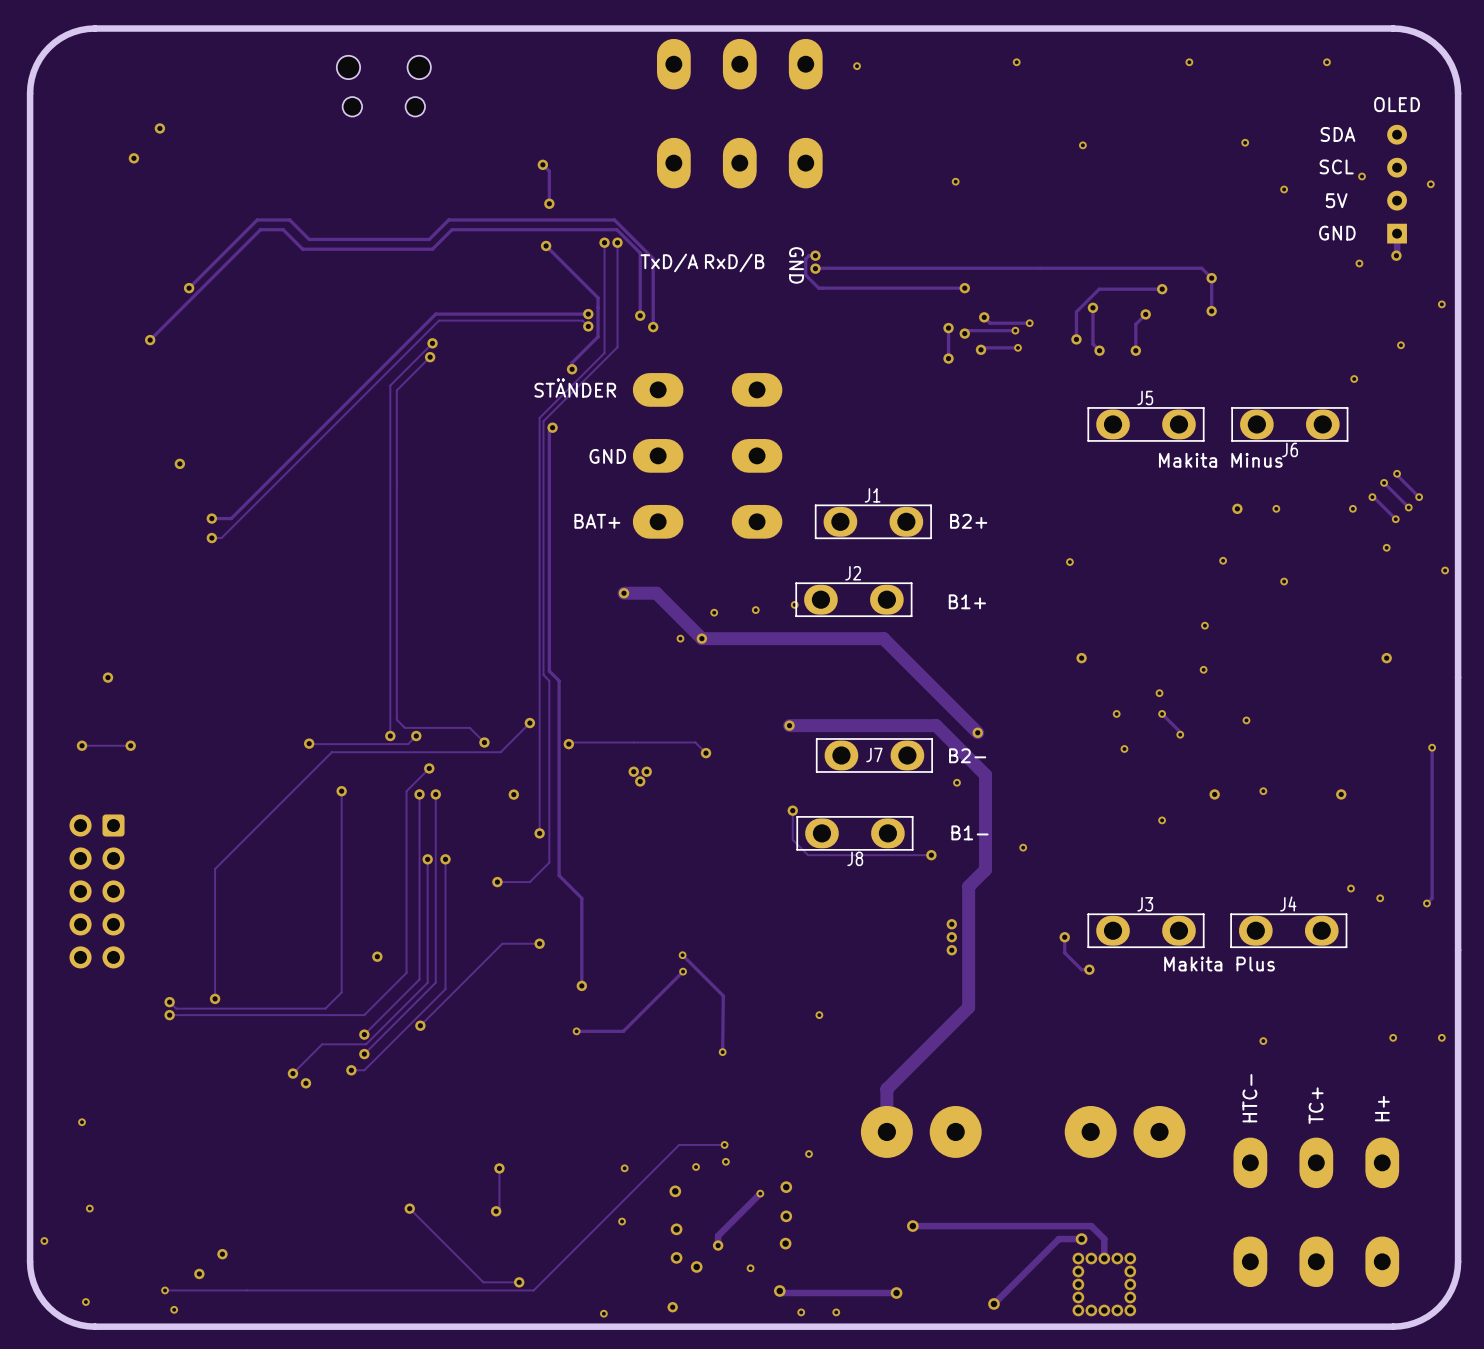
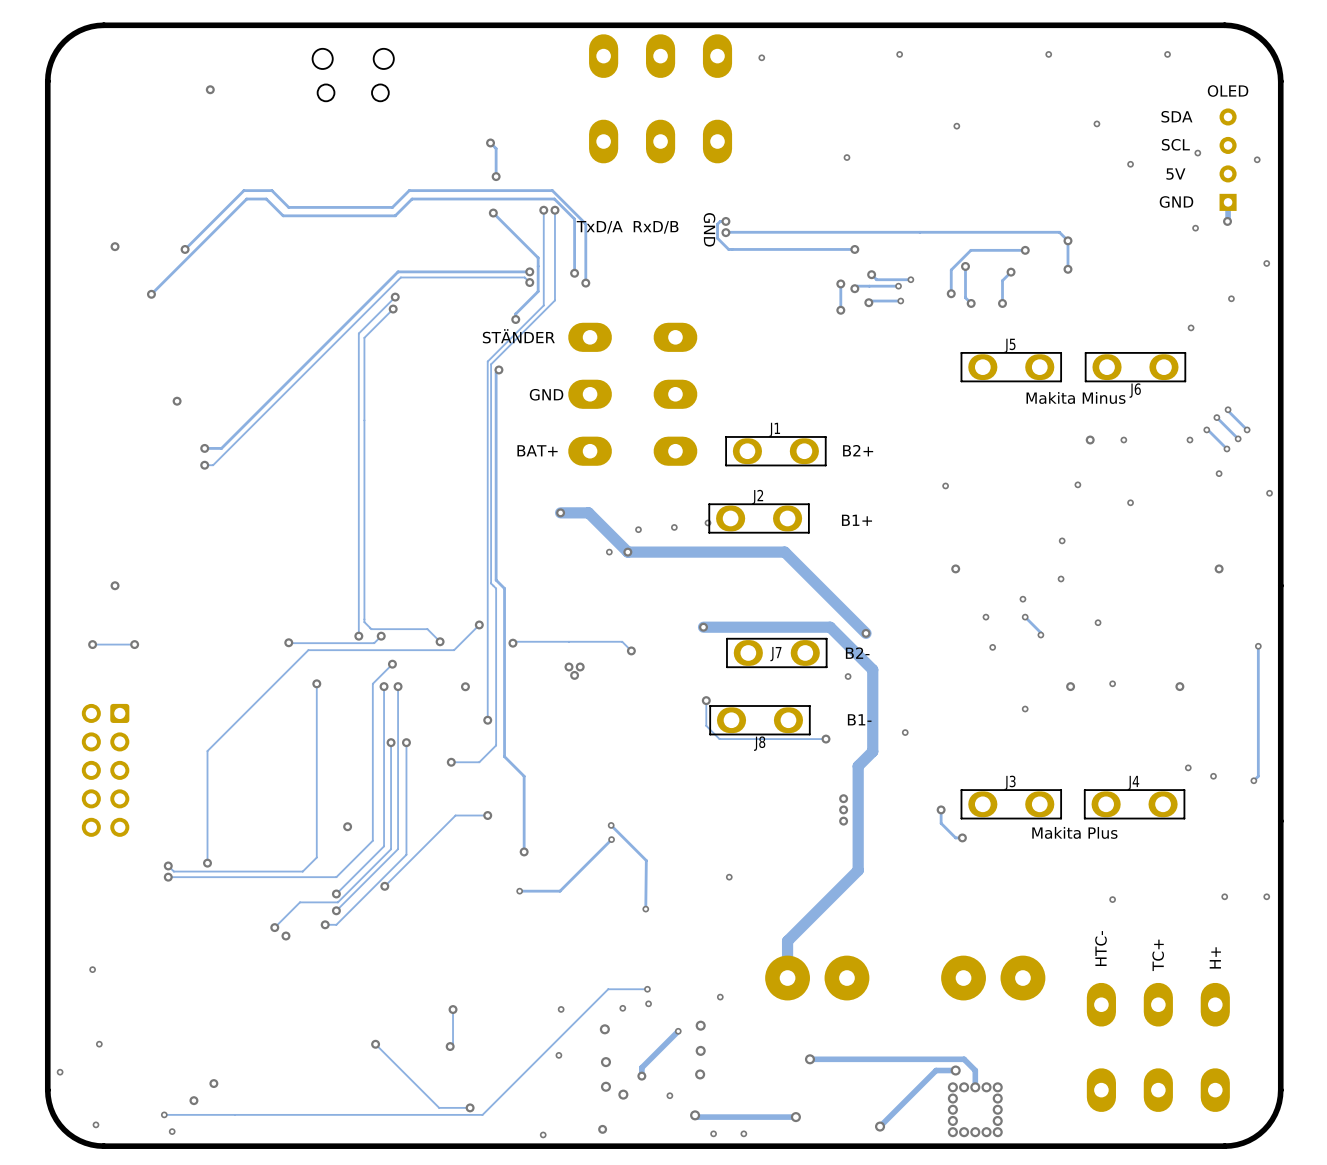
via: none -> (210, 89)
via: (159, 128) -> none
via: (133, 158) -> none
via: none -> (115, 246)

